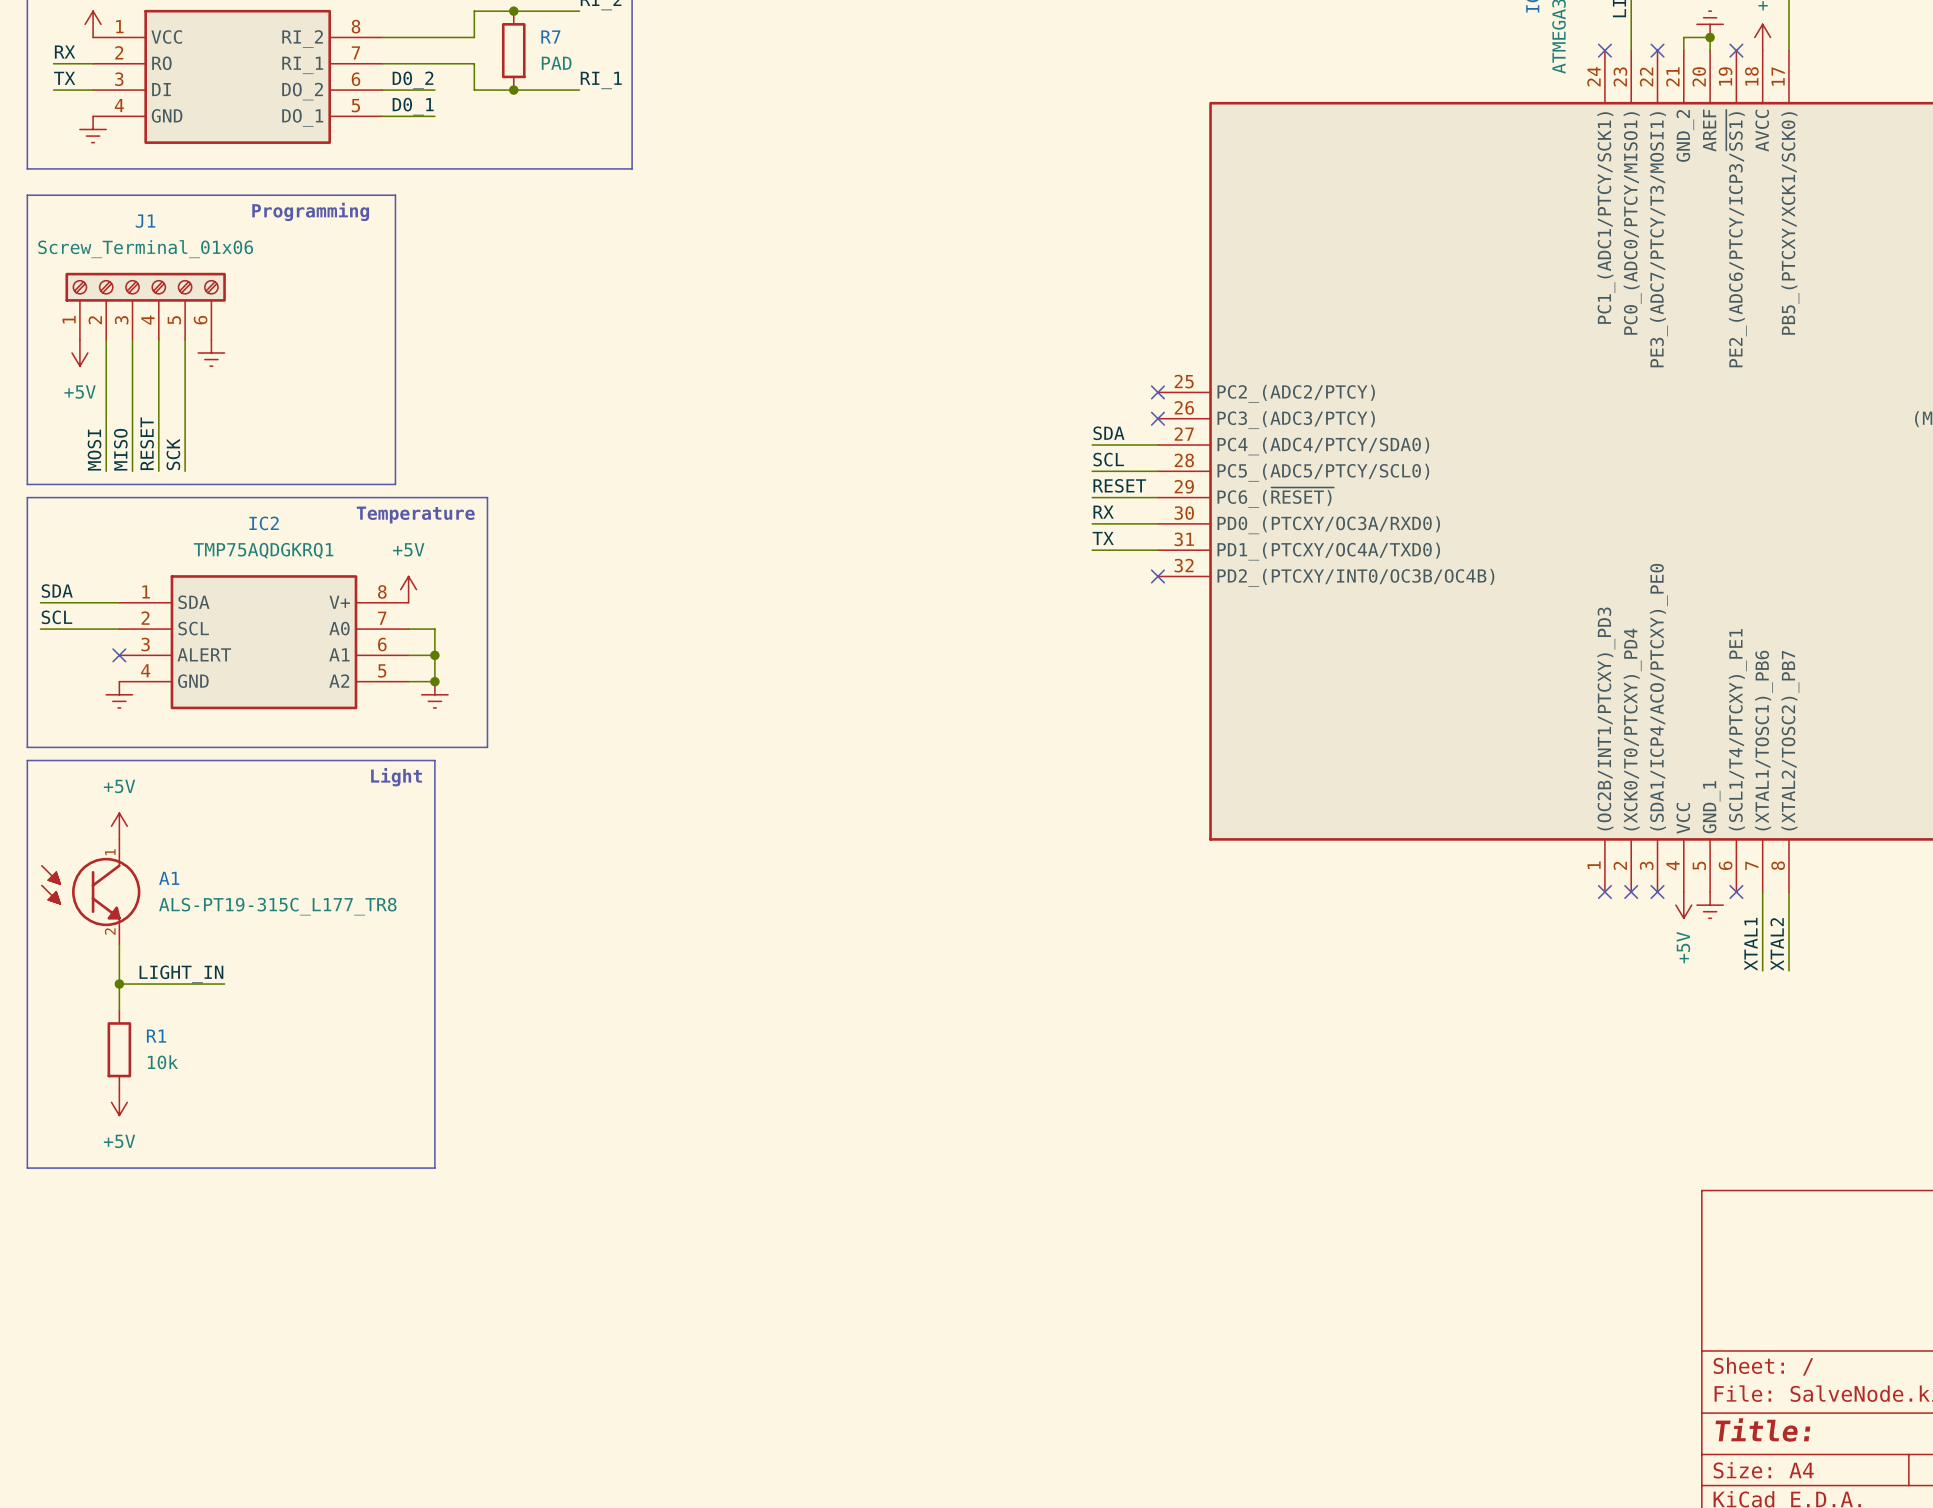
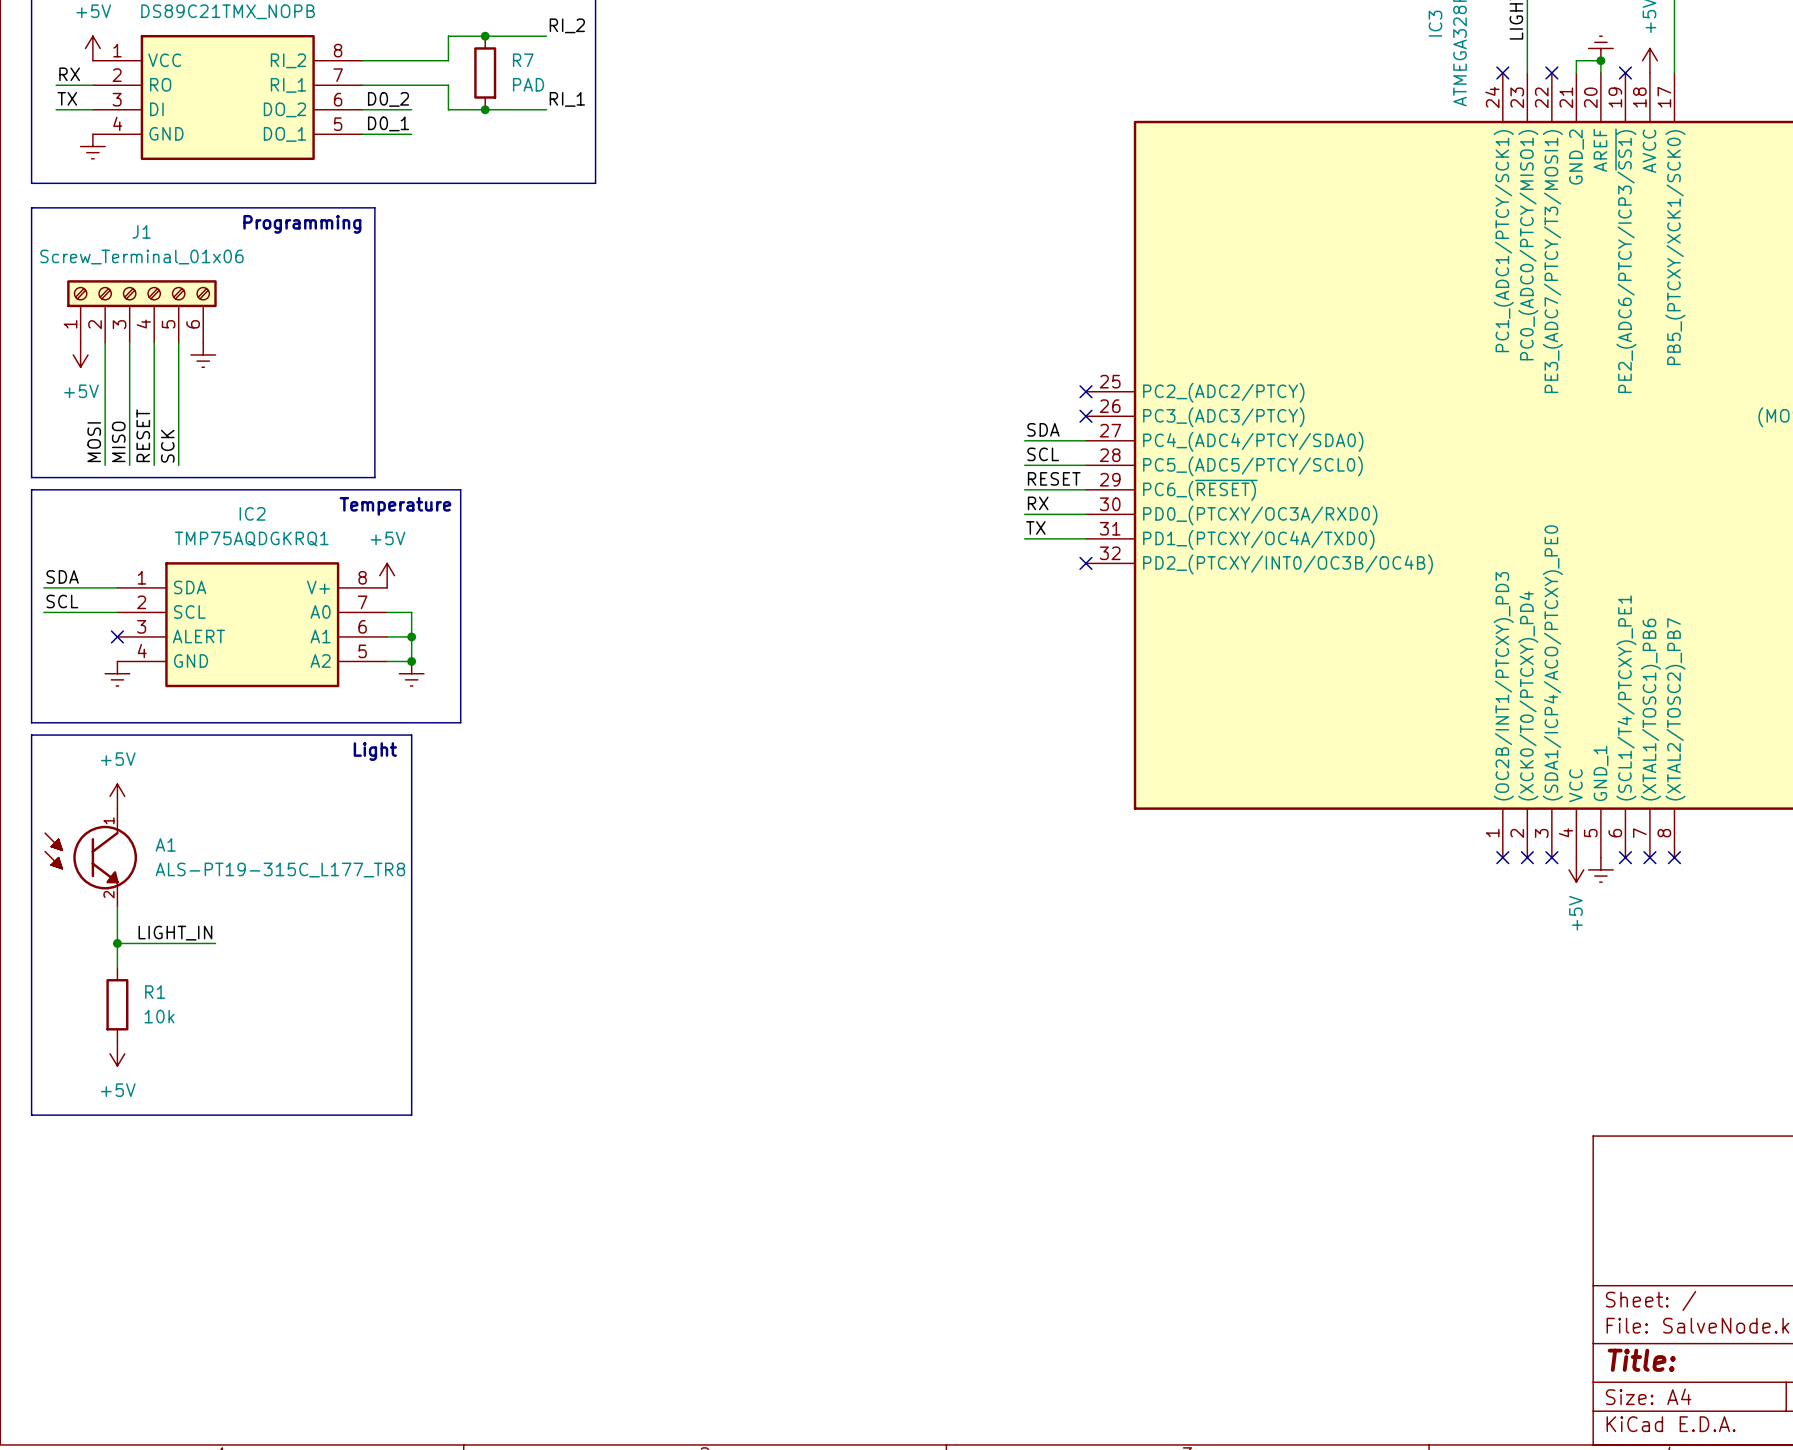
wire: (1762, 891) (1762, 970) -> none
no-connect mark: none -> (1649, 857)
wire: (1788, 891) (1788, 970) -> none
no-connect mark: none -> (1674, 857)
label: XTAL1 (1750, 944) -> none
label: XTAL2 (1777, 944) -> none

